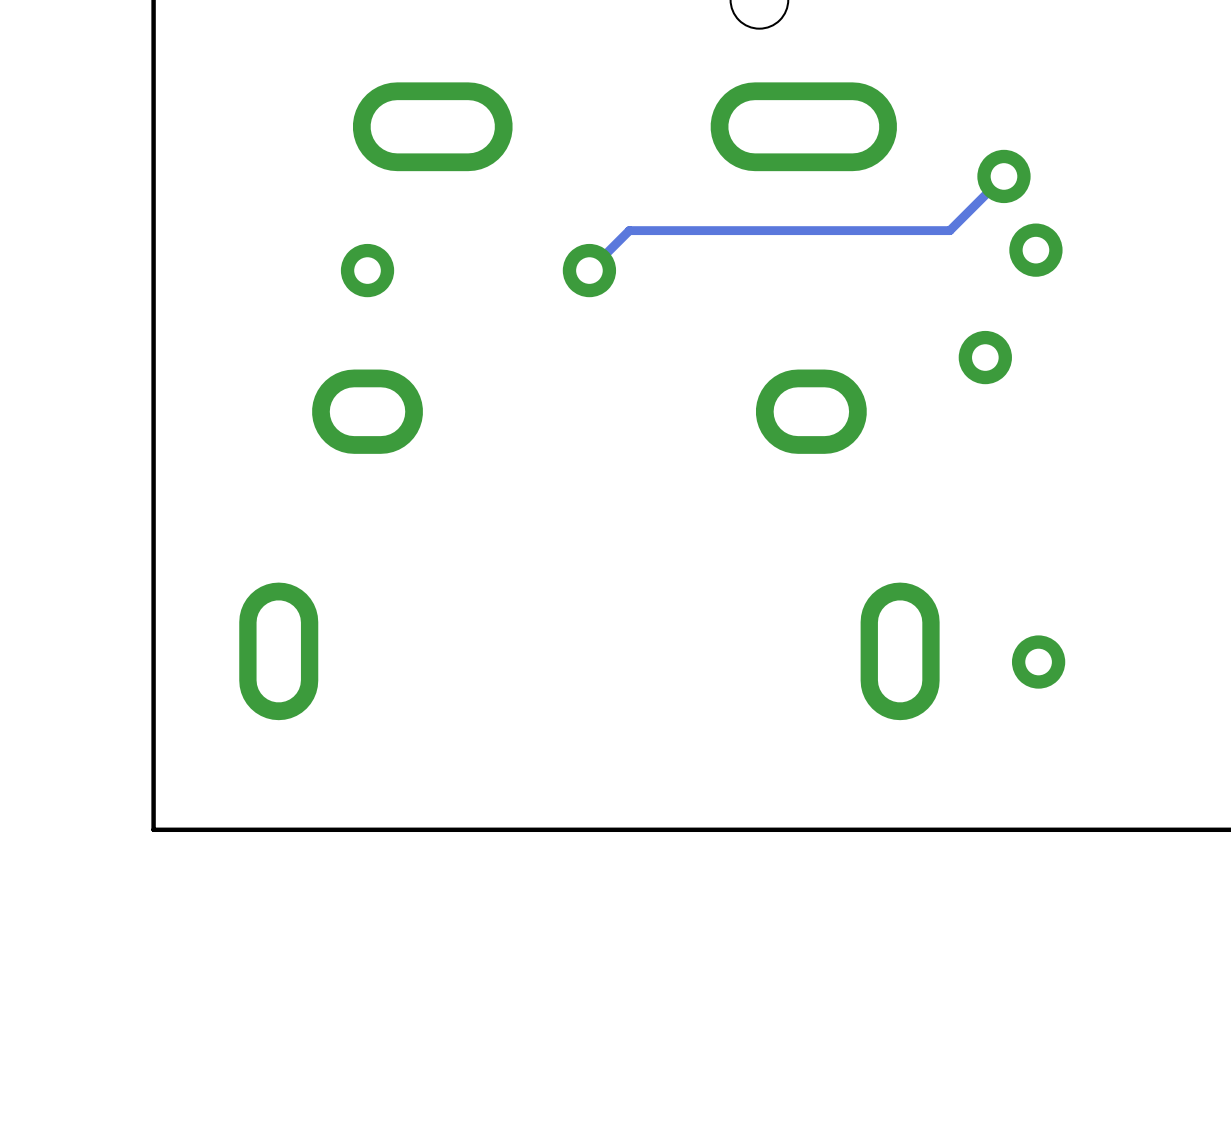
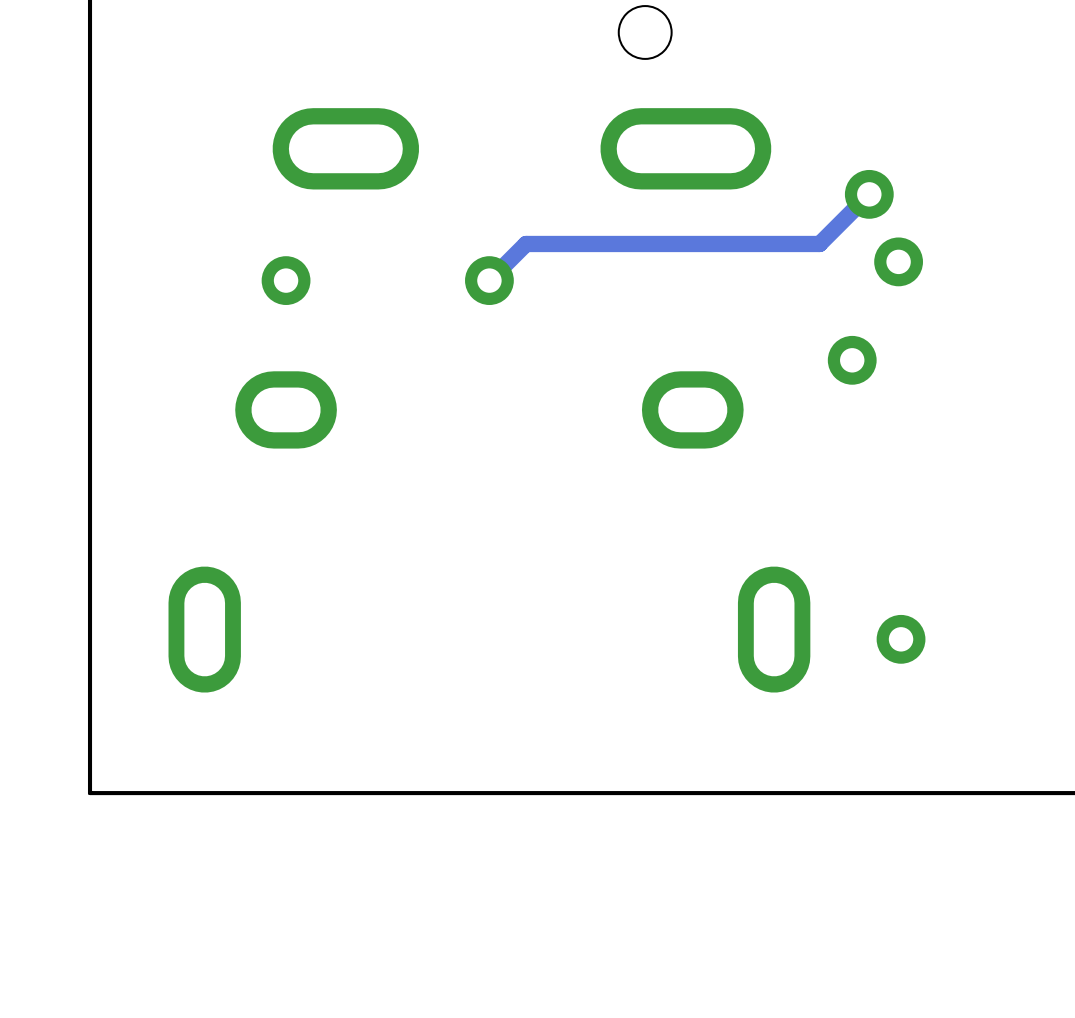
track width: thin (1003, 176) (949, 230) (629, 230) (589, 270) -> thick (869, 194) (819, 243) (526, 243) (489, 280)

